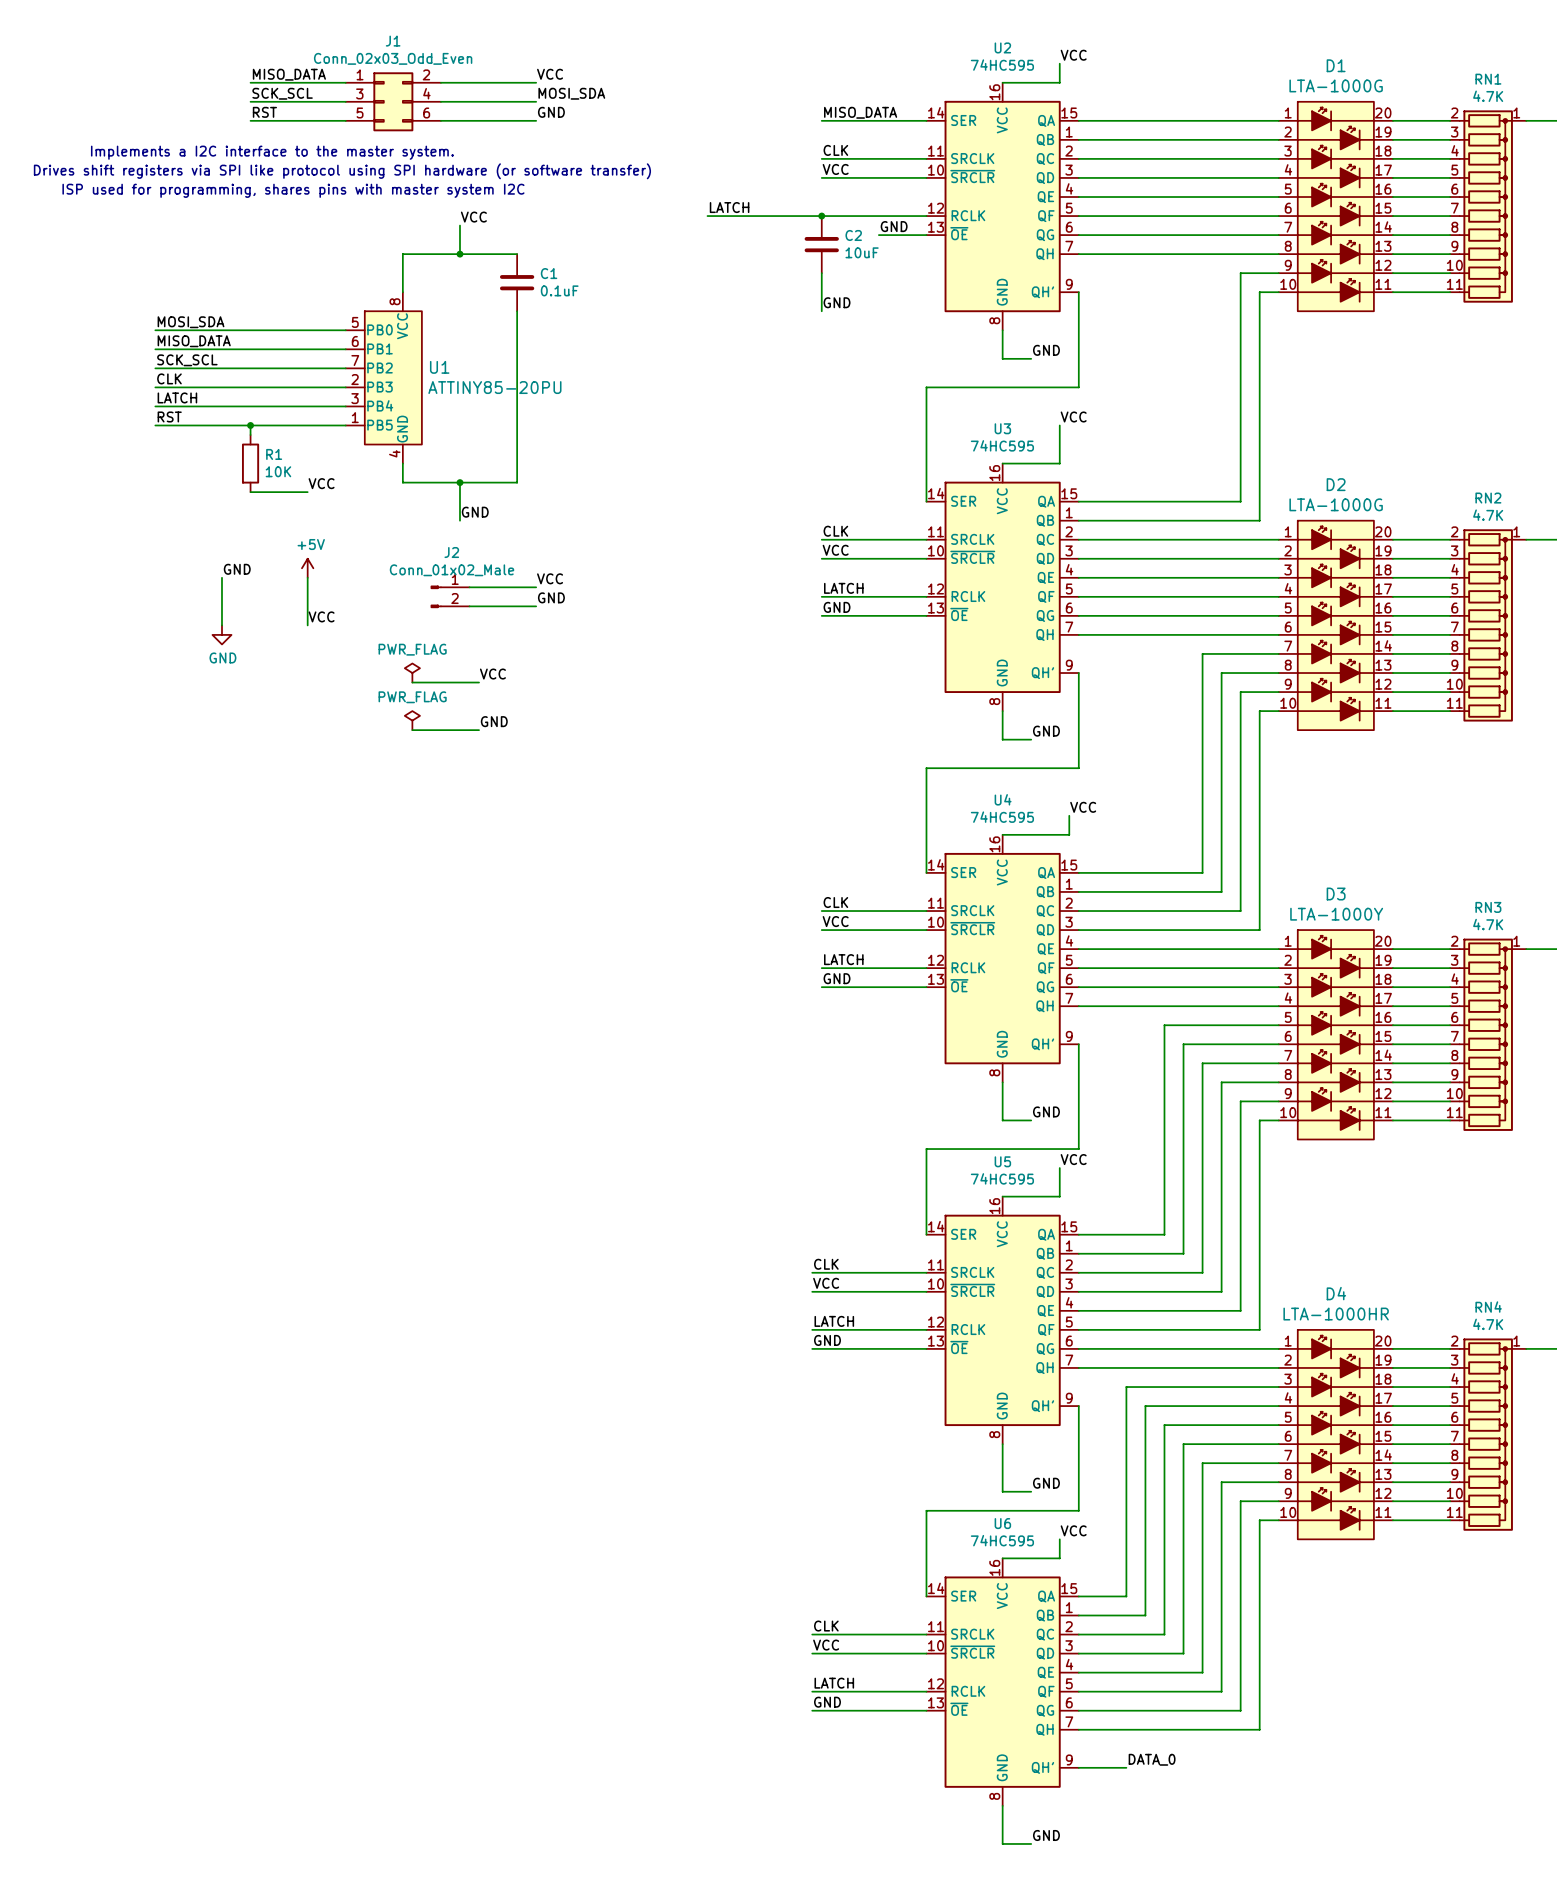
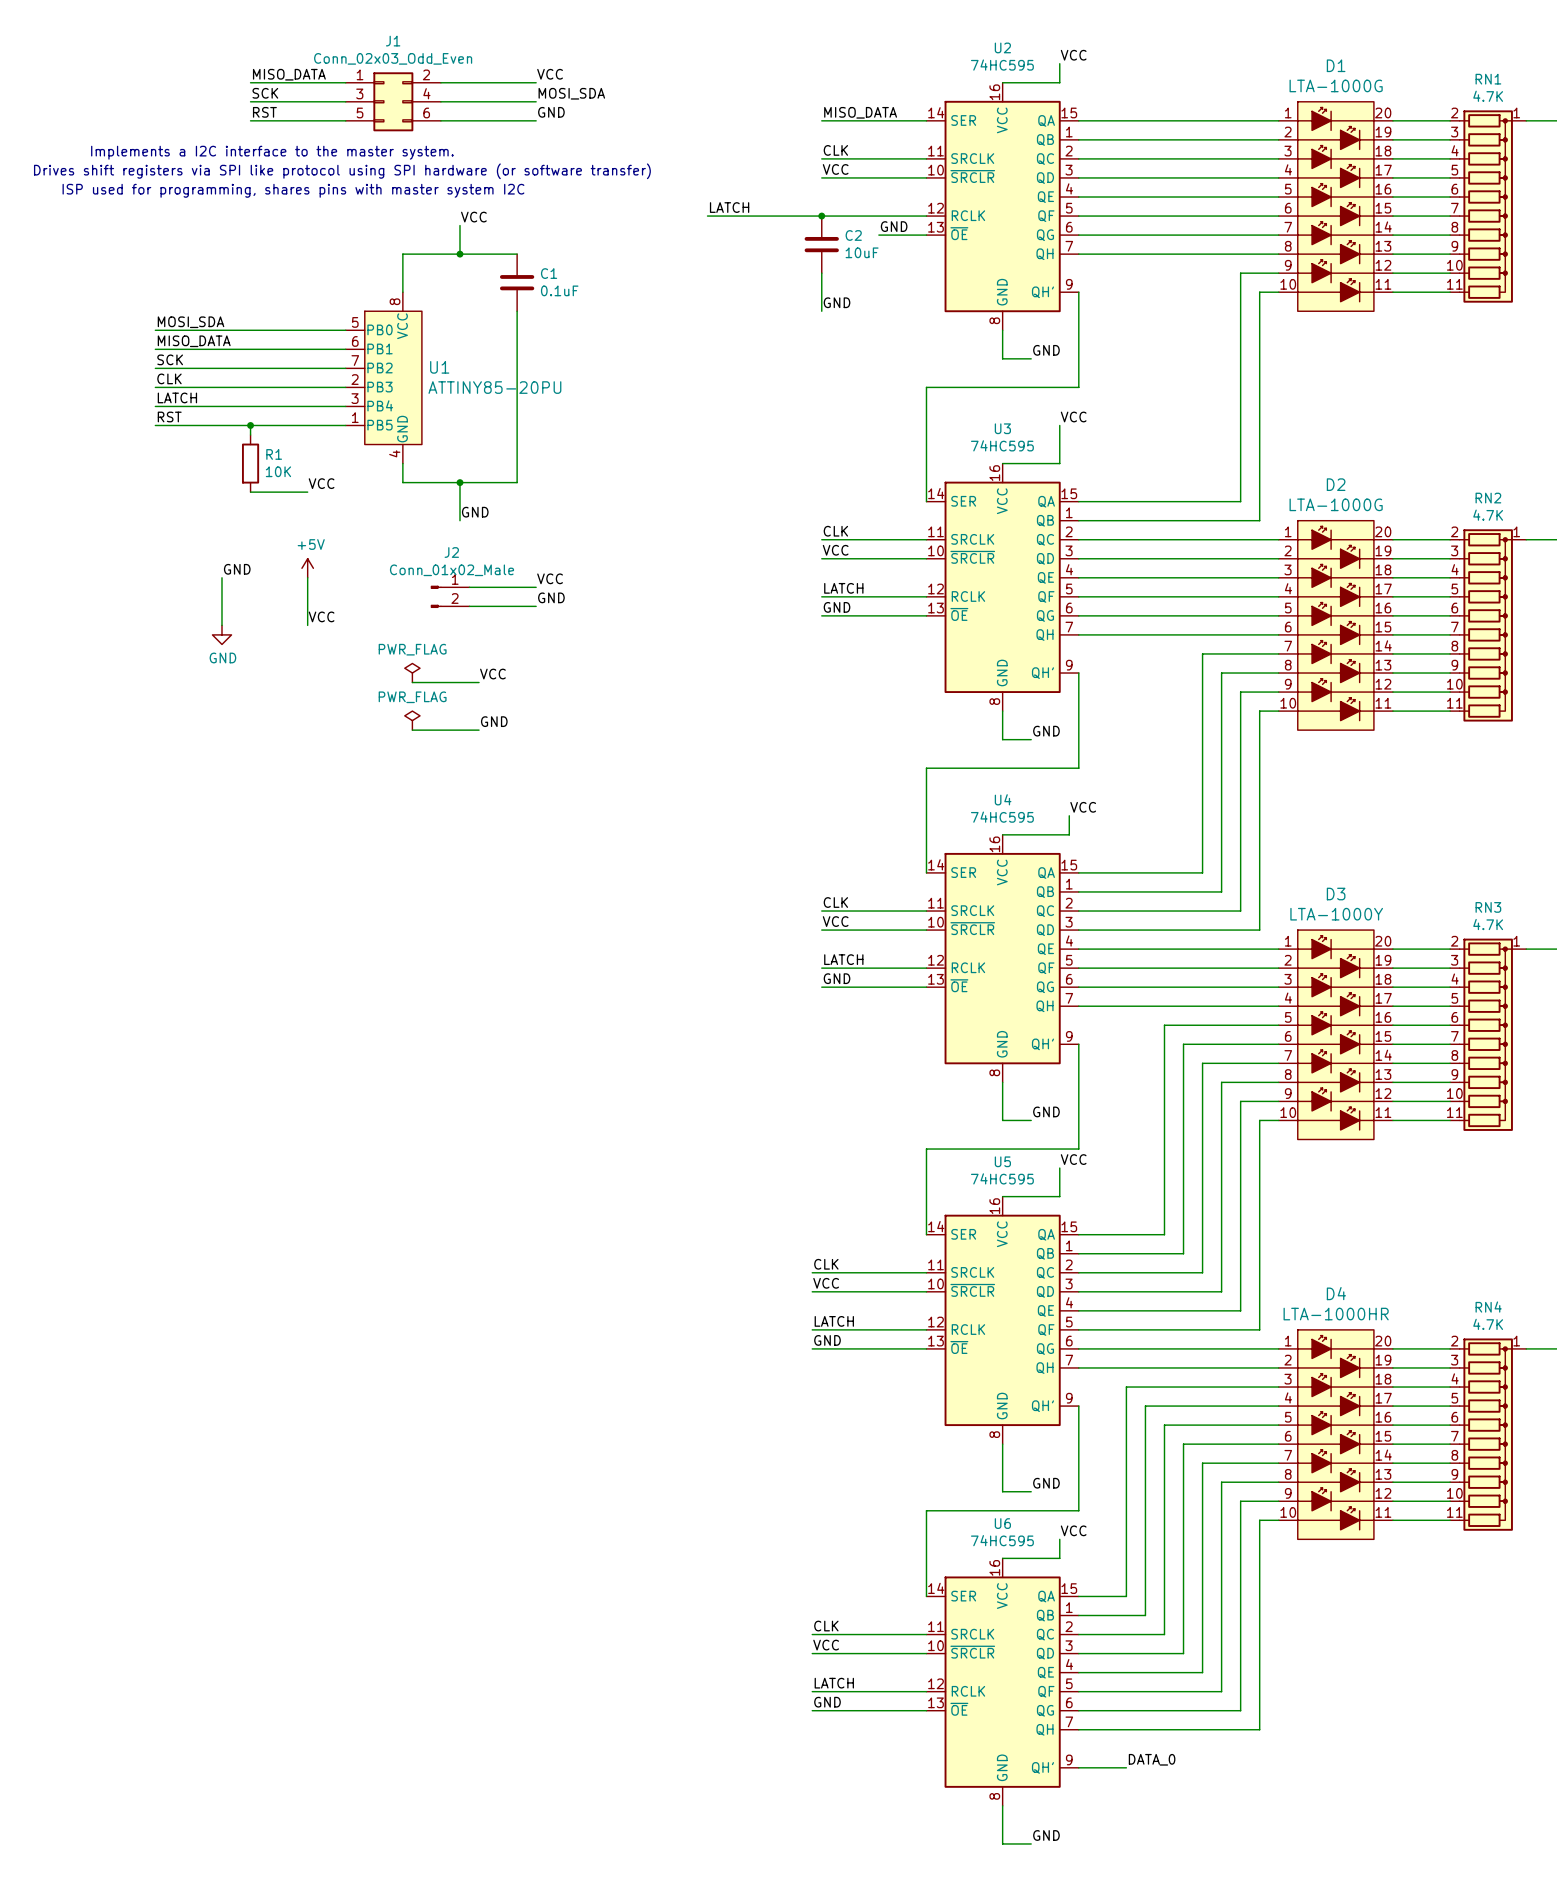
label: SCK_SCL (282, 93) -> SCK (265, 93)
label: SCK_SCL (187, 360) -> SCK (170, 359)

